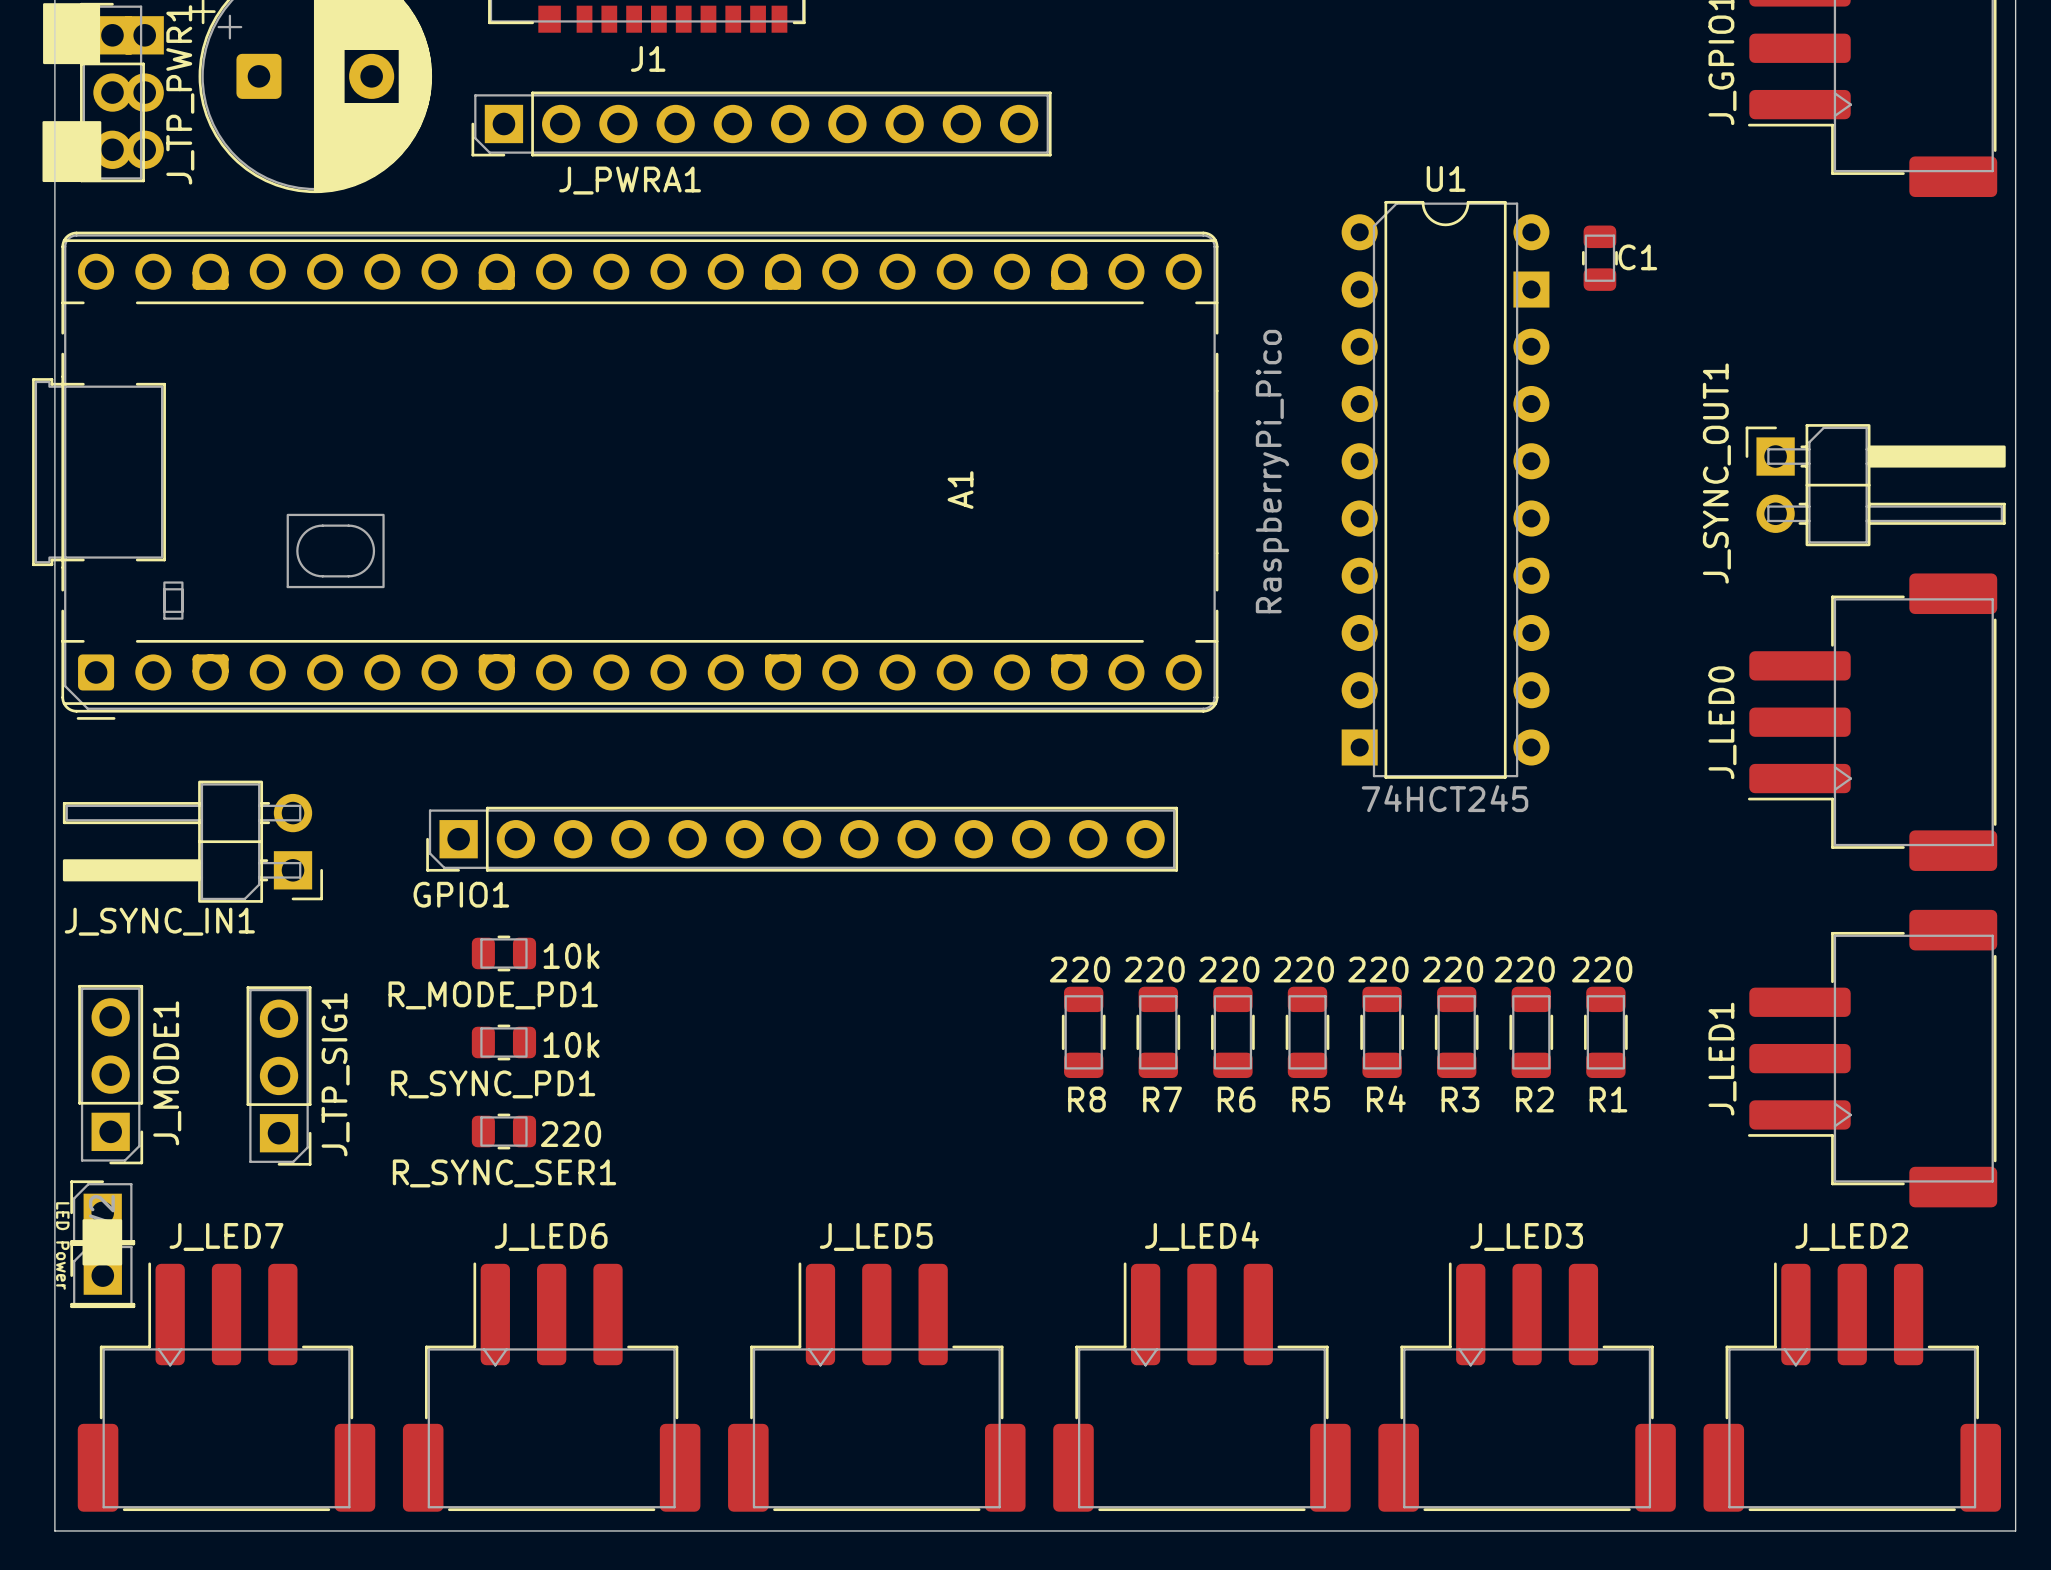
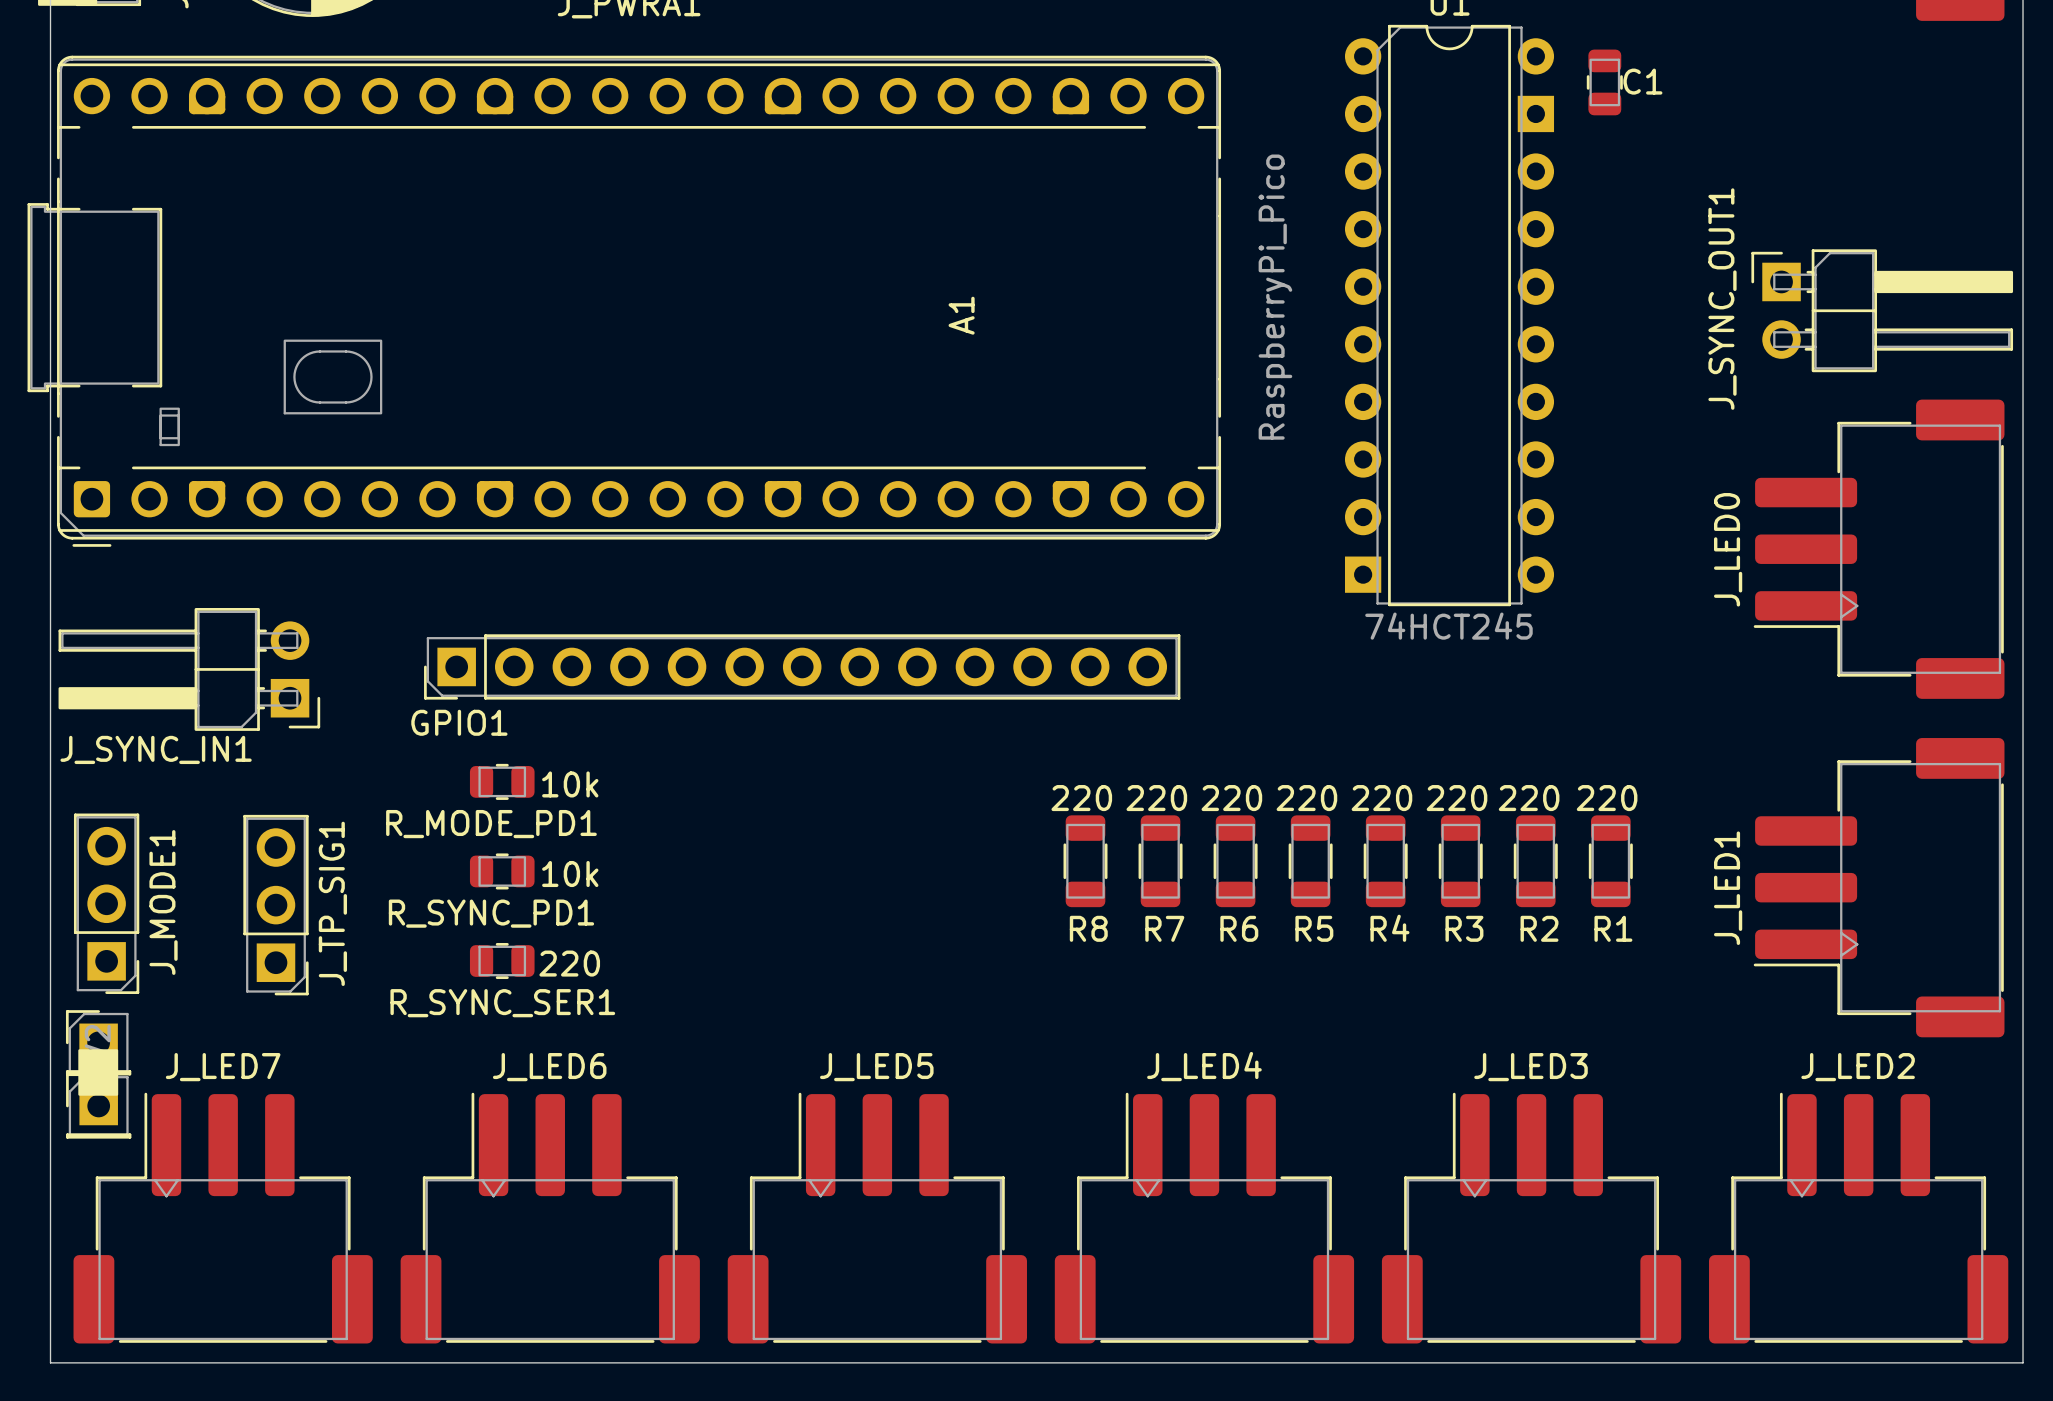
text: LED Power (62, 1245) -> none

